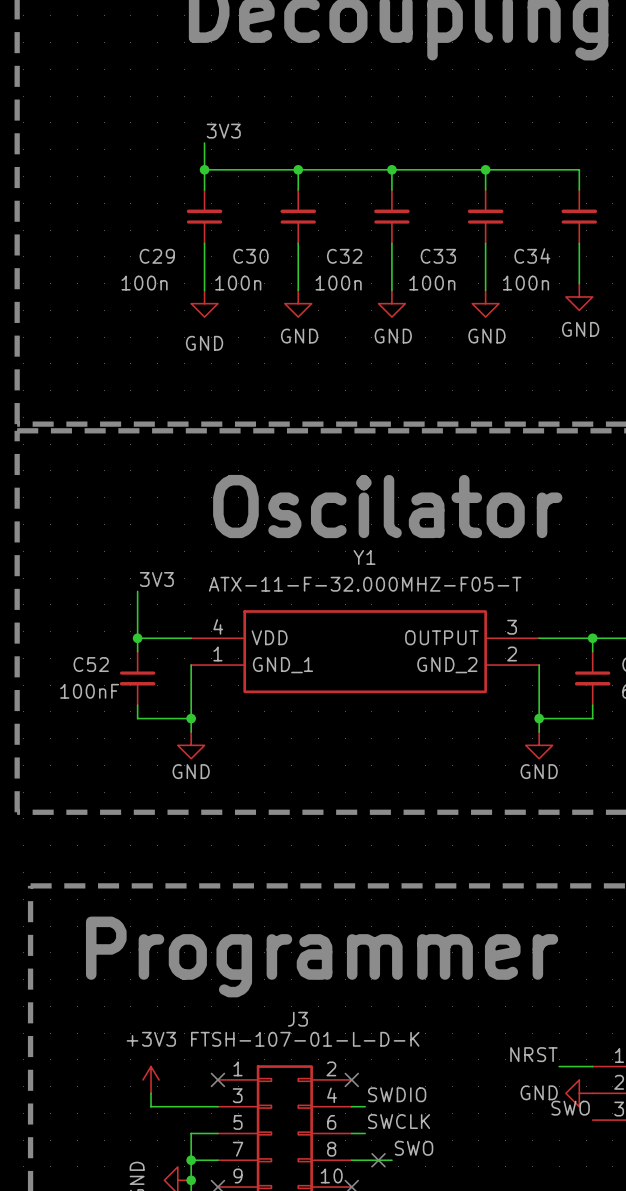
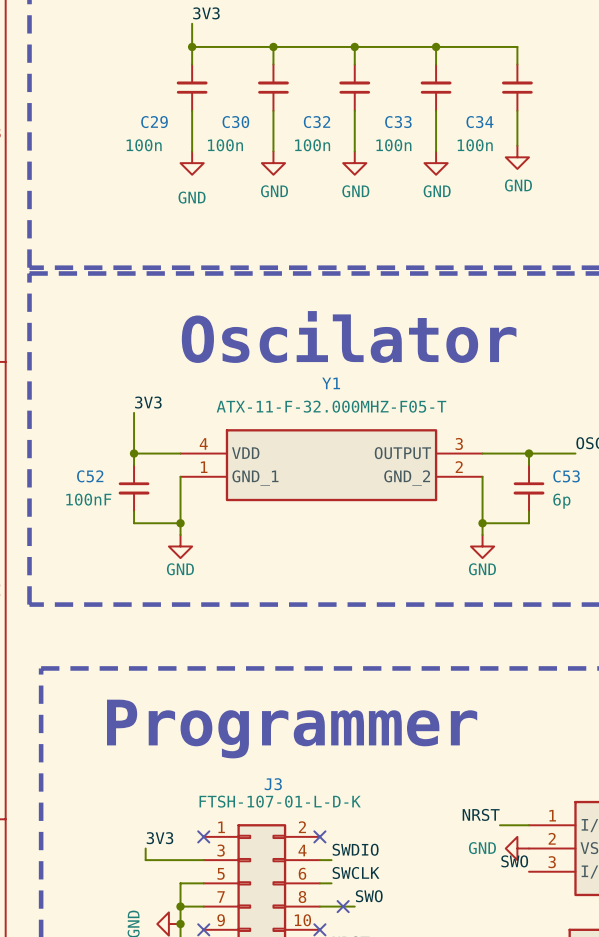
power symbol: +3V3 (151, 1079) -> none
label: none -> 3V3 (159, 838)

